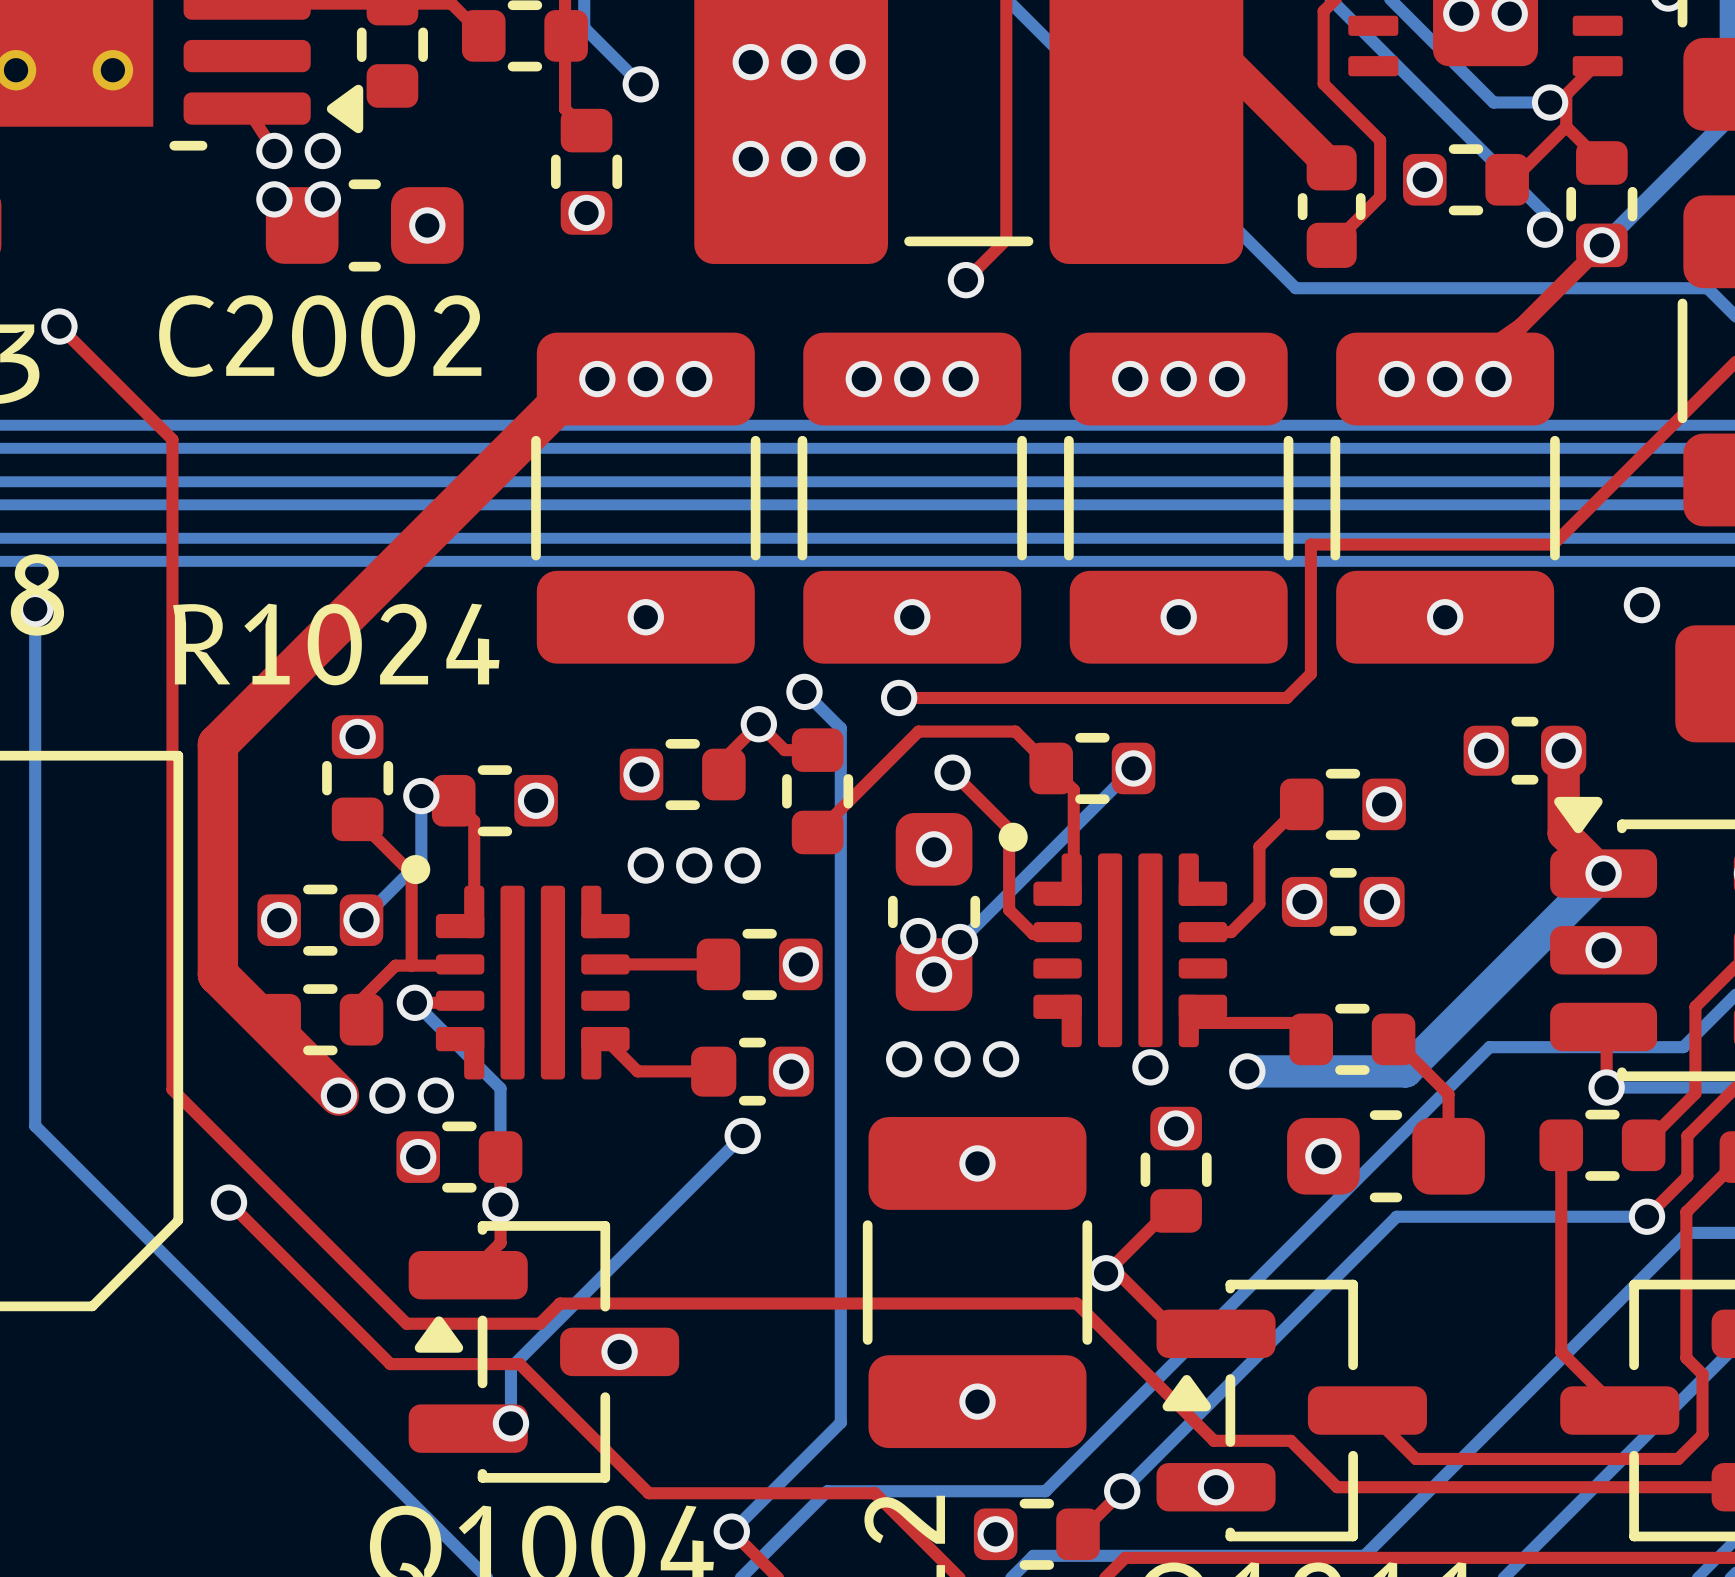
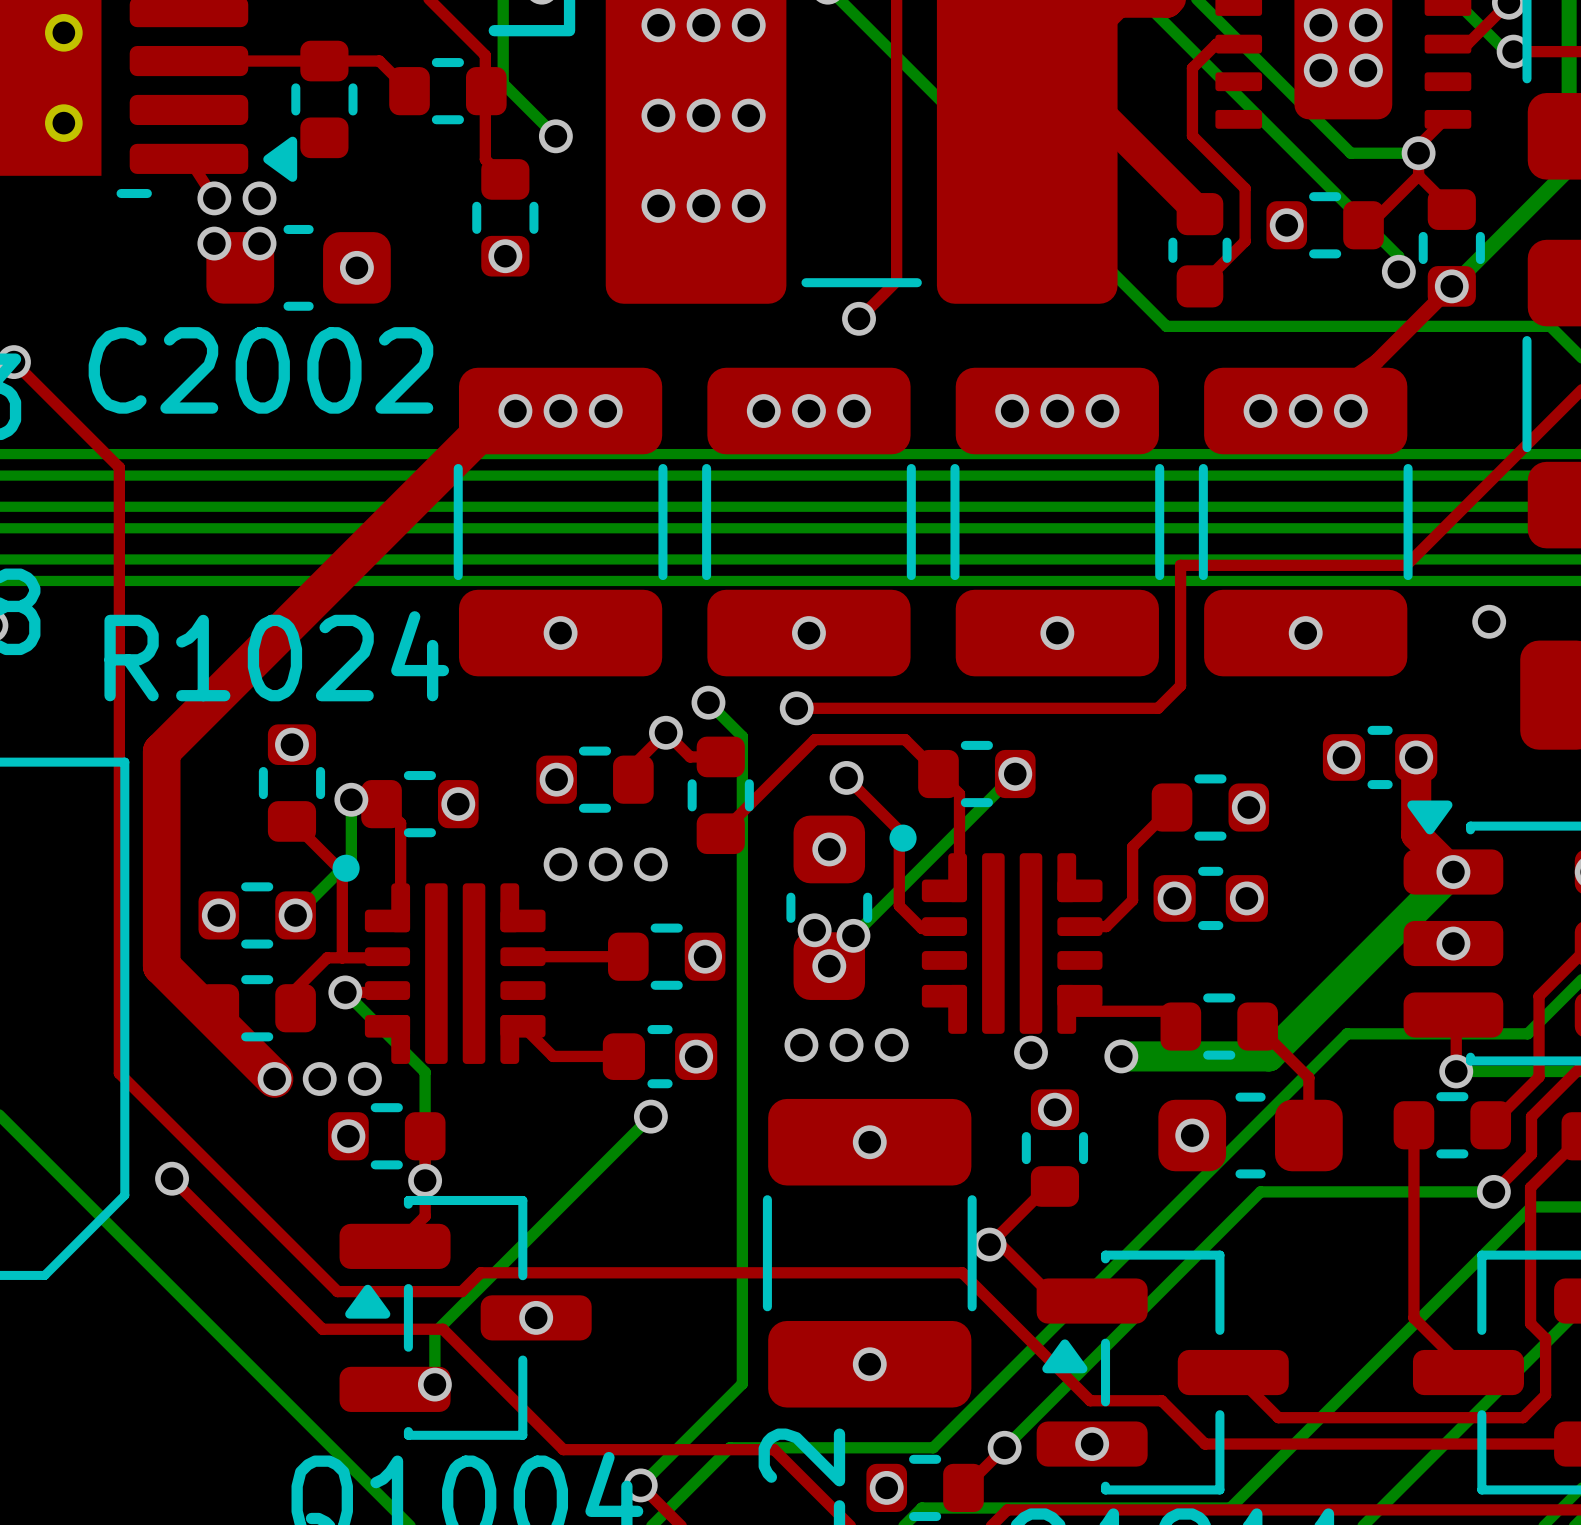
via position: (1550, 102) -> (1418, 153)

